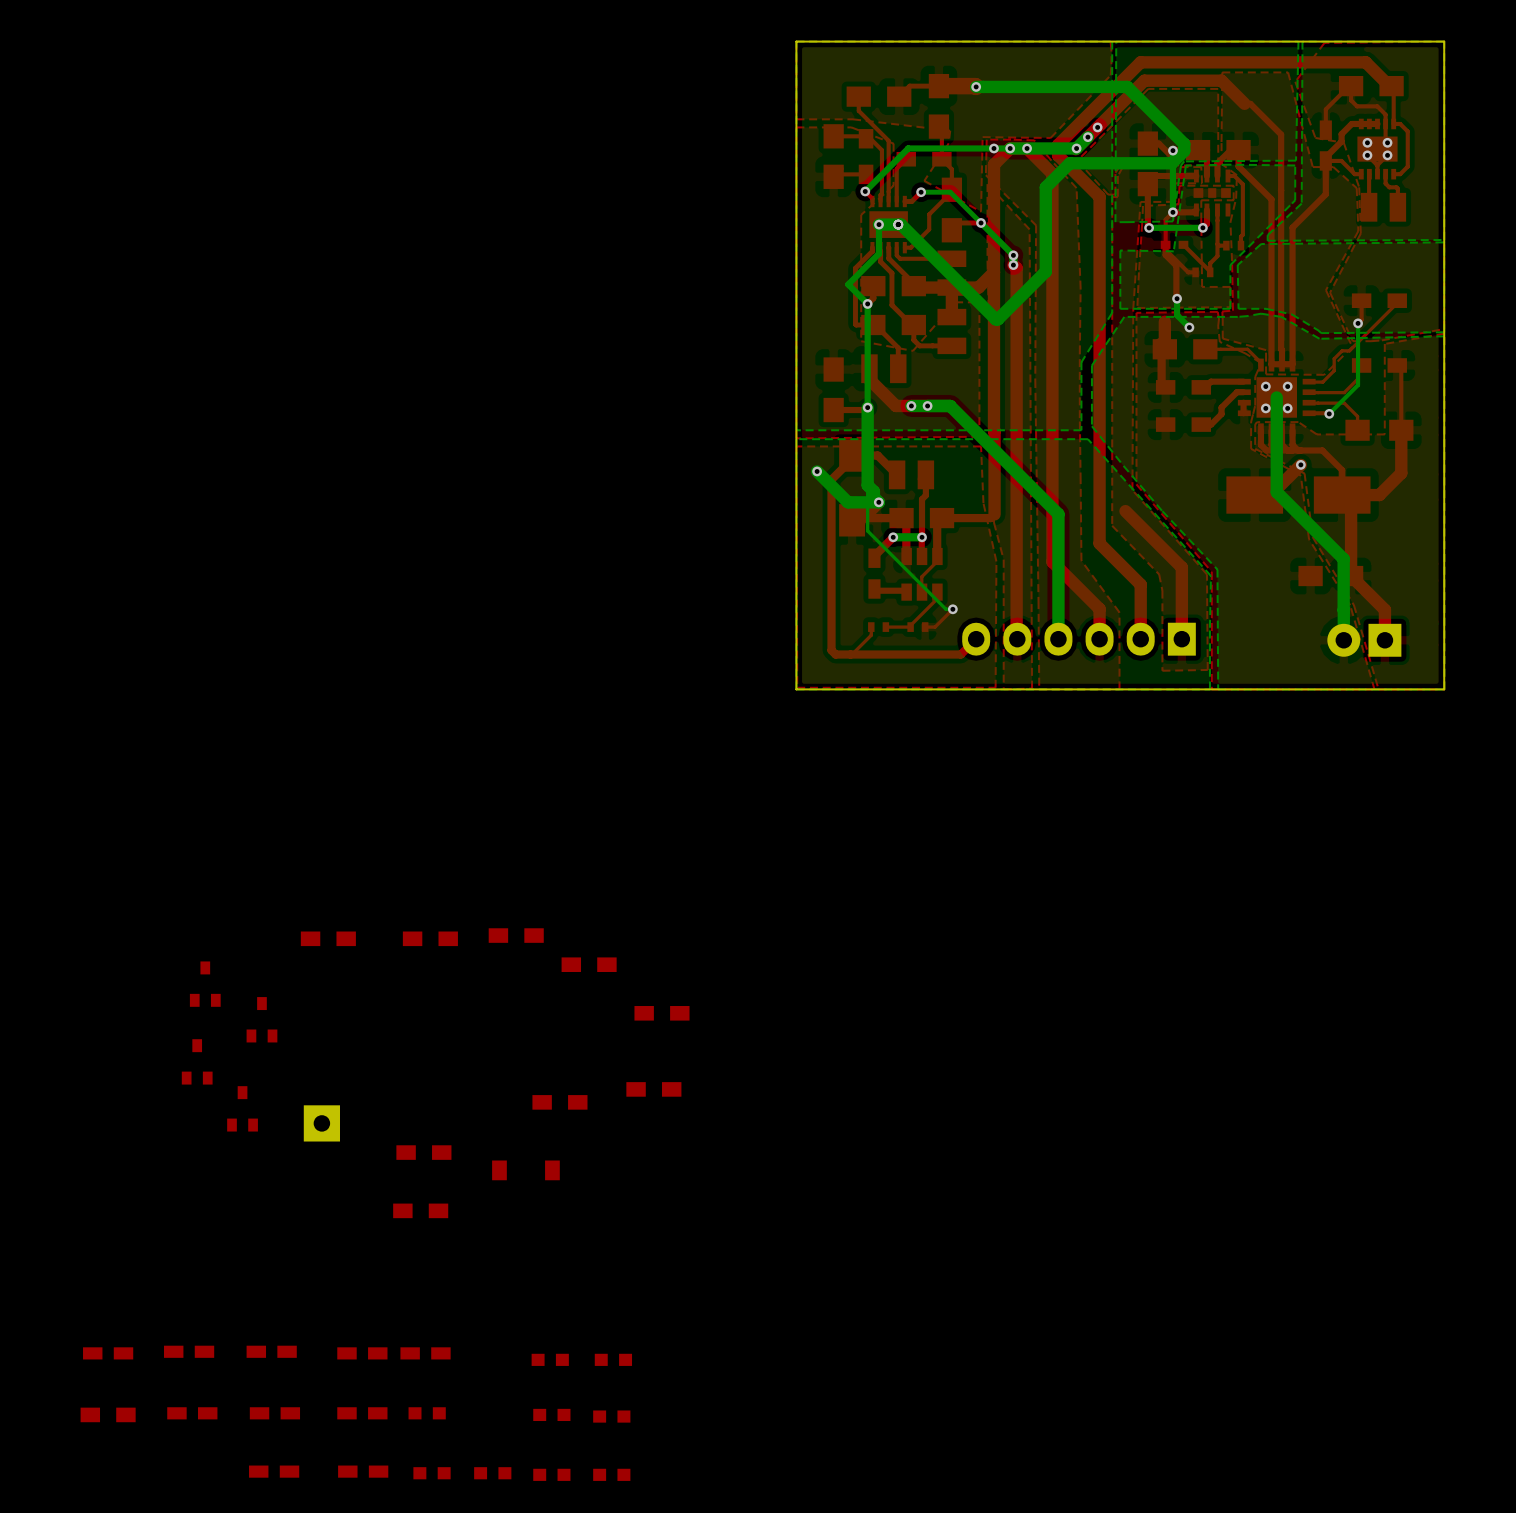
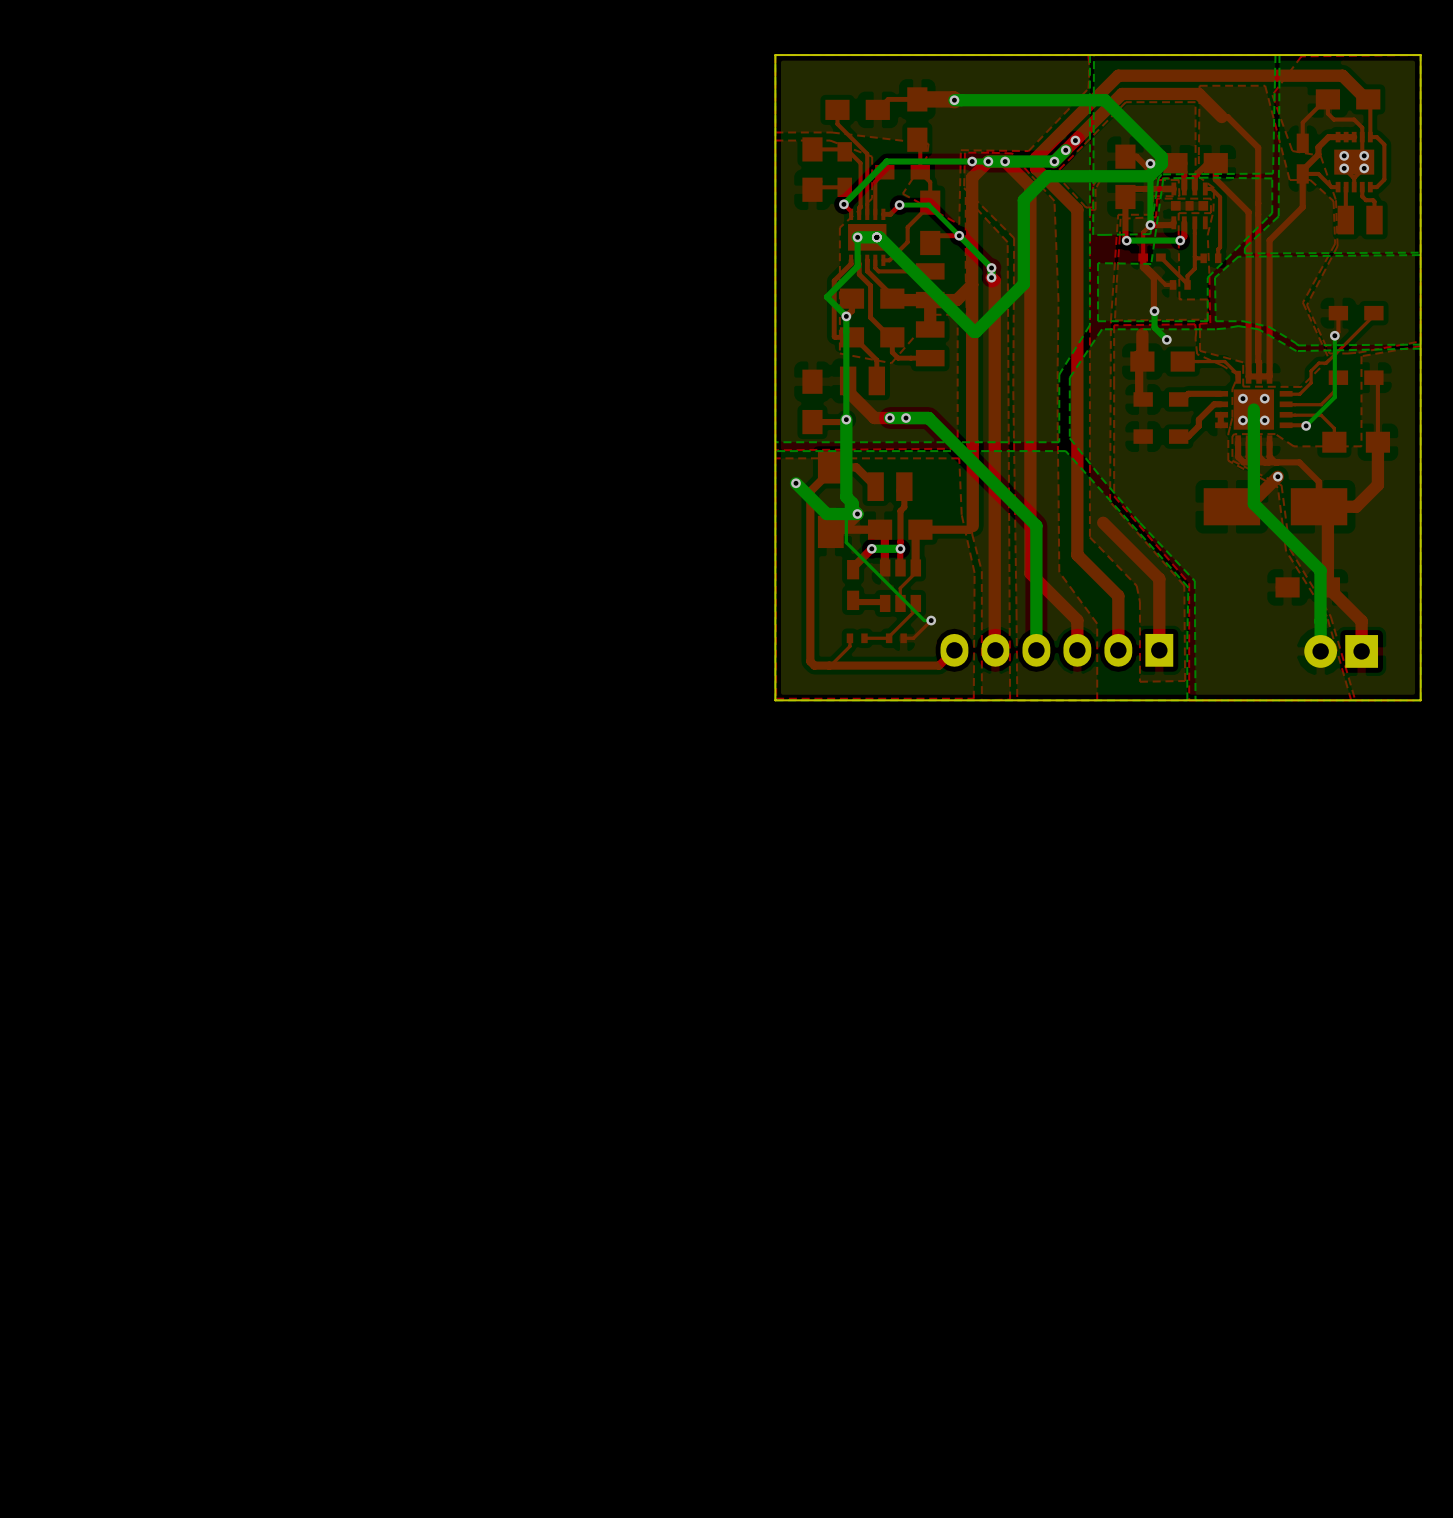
part: (516, 935) -> none
part: (328, 938) -> none
part: (430, 938) -> none
part: (589, 964) -> none
part: (205, 984) -> none
part: (661, 1013) -> none
part: (261, 1019) -> none
part: (197, 1061) -> none
part: (653, 1089) -> none
part: (559, 1102) -> none
part: (242, 1108) -> none
part: (321, 1123) -> none
part: (423, 1152) -> none
part: (525, 1170) -> none
part: (420, 1210) -> none
part: (189, 1351) -> none
part: (271, 1351) -> none
part: (108, 1353) -> none
part: (362, 1353) -> none
part: (425, 1353) -> none
part: (550, 1359) -> none
part: (613, 1359) -> none
part: (192, 1413) -> none
part: (274, 1413) -> none
part: (362, 1413) -> none
part: (427, 1413) -> none
part: (108, 1414) -> none
part: (551, 1414) -> none
part: (611, 1416) -> none
part: (274, 1471) -> none
part: (363, 1471) -> none
part: (432, 1473) -> none
part: (492, 1473) -> none
part: (551, 1474) -> none
part: (611, 1474) -> none

